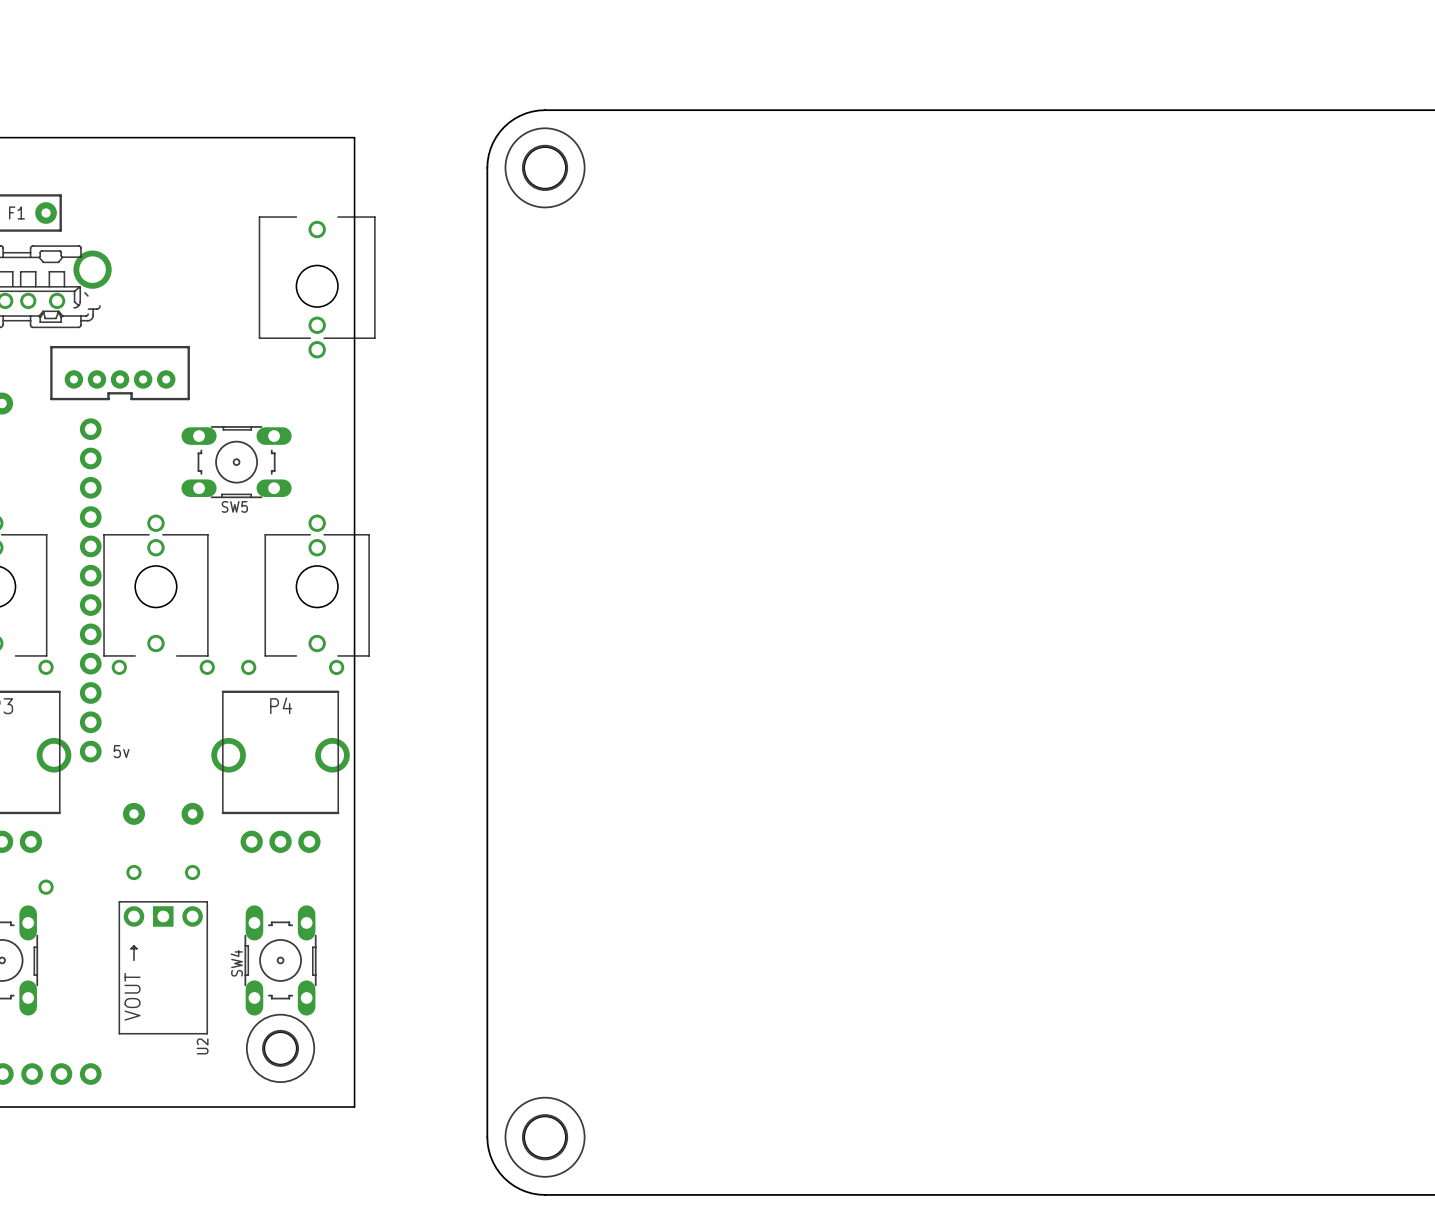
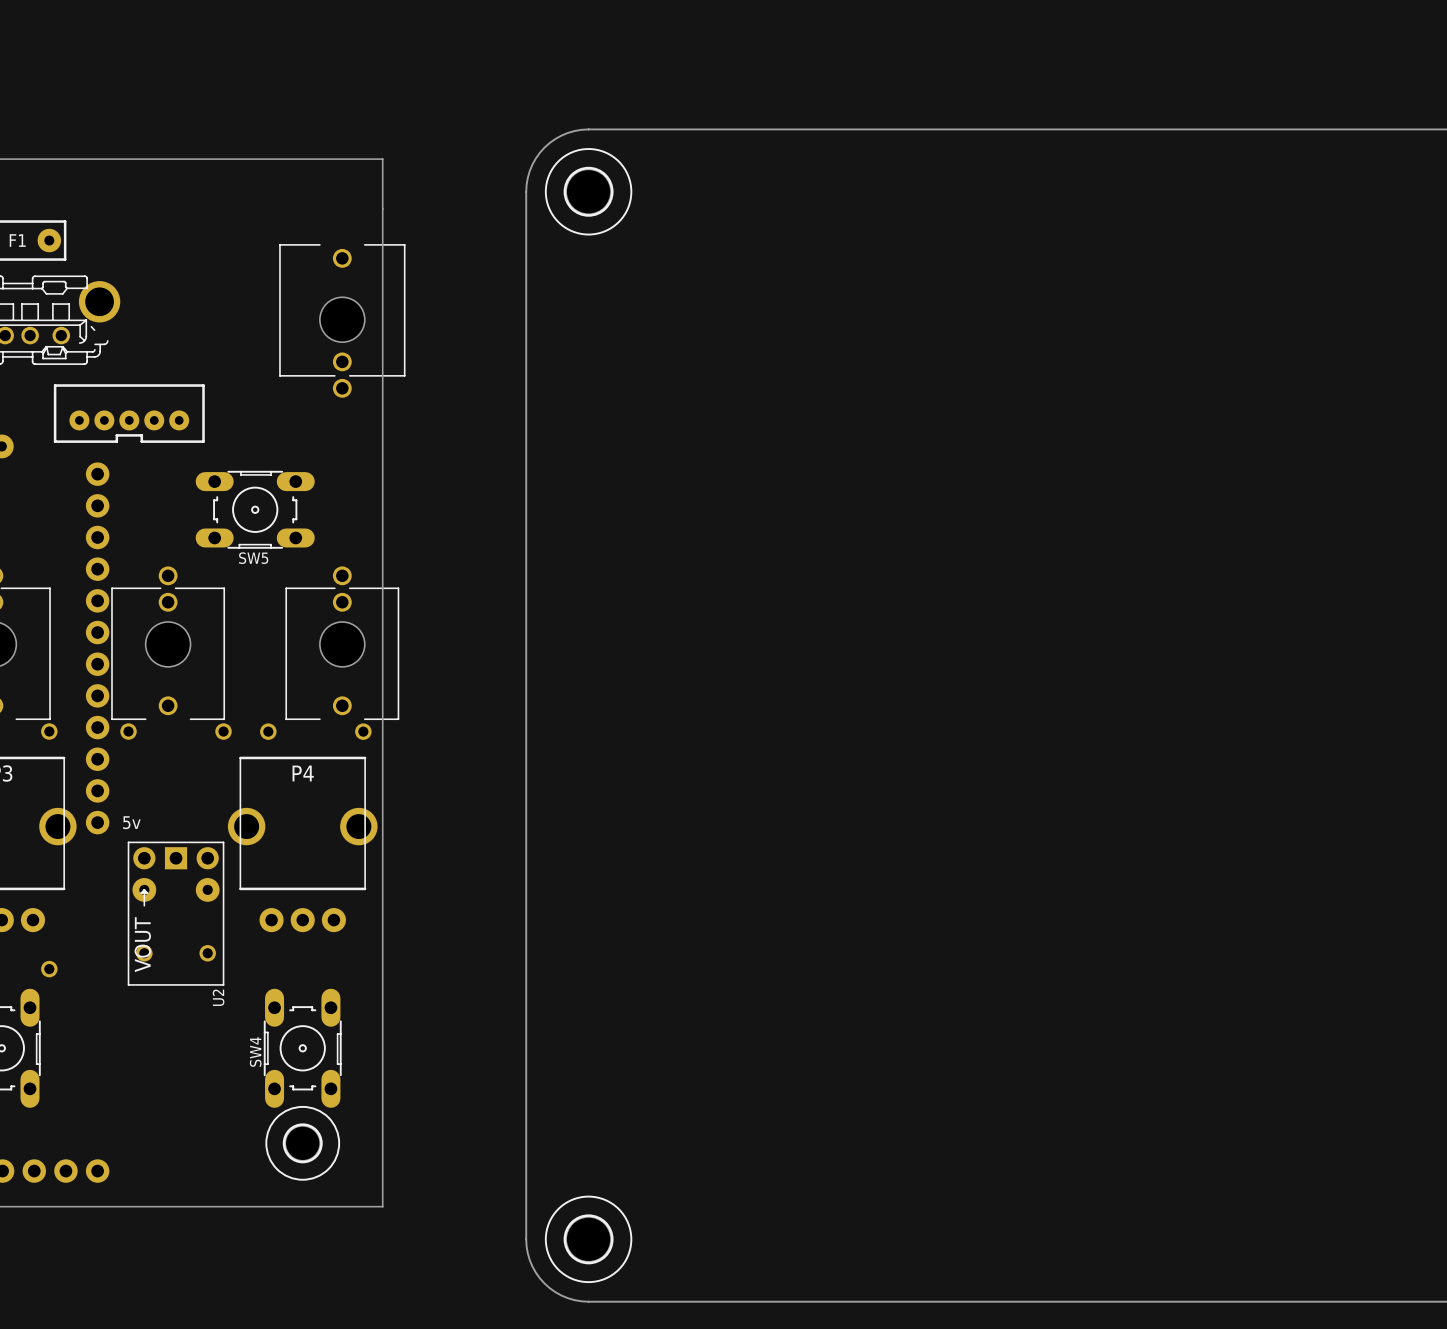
U2 position: (163, 967) -> (176, 913)

